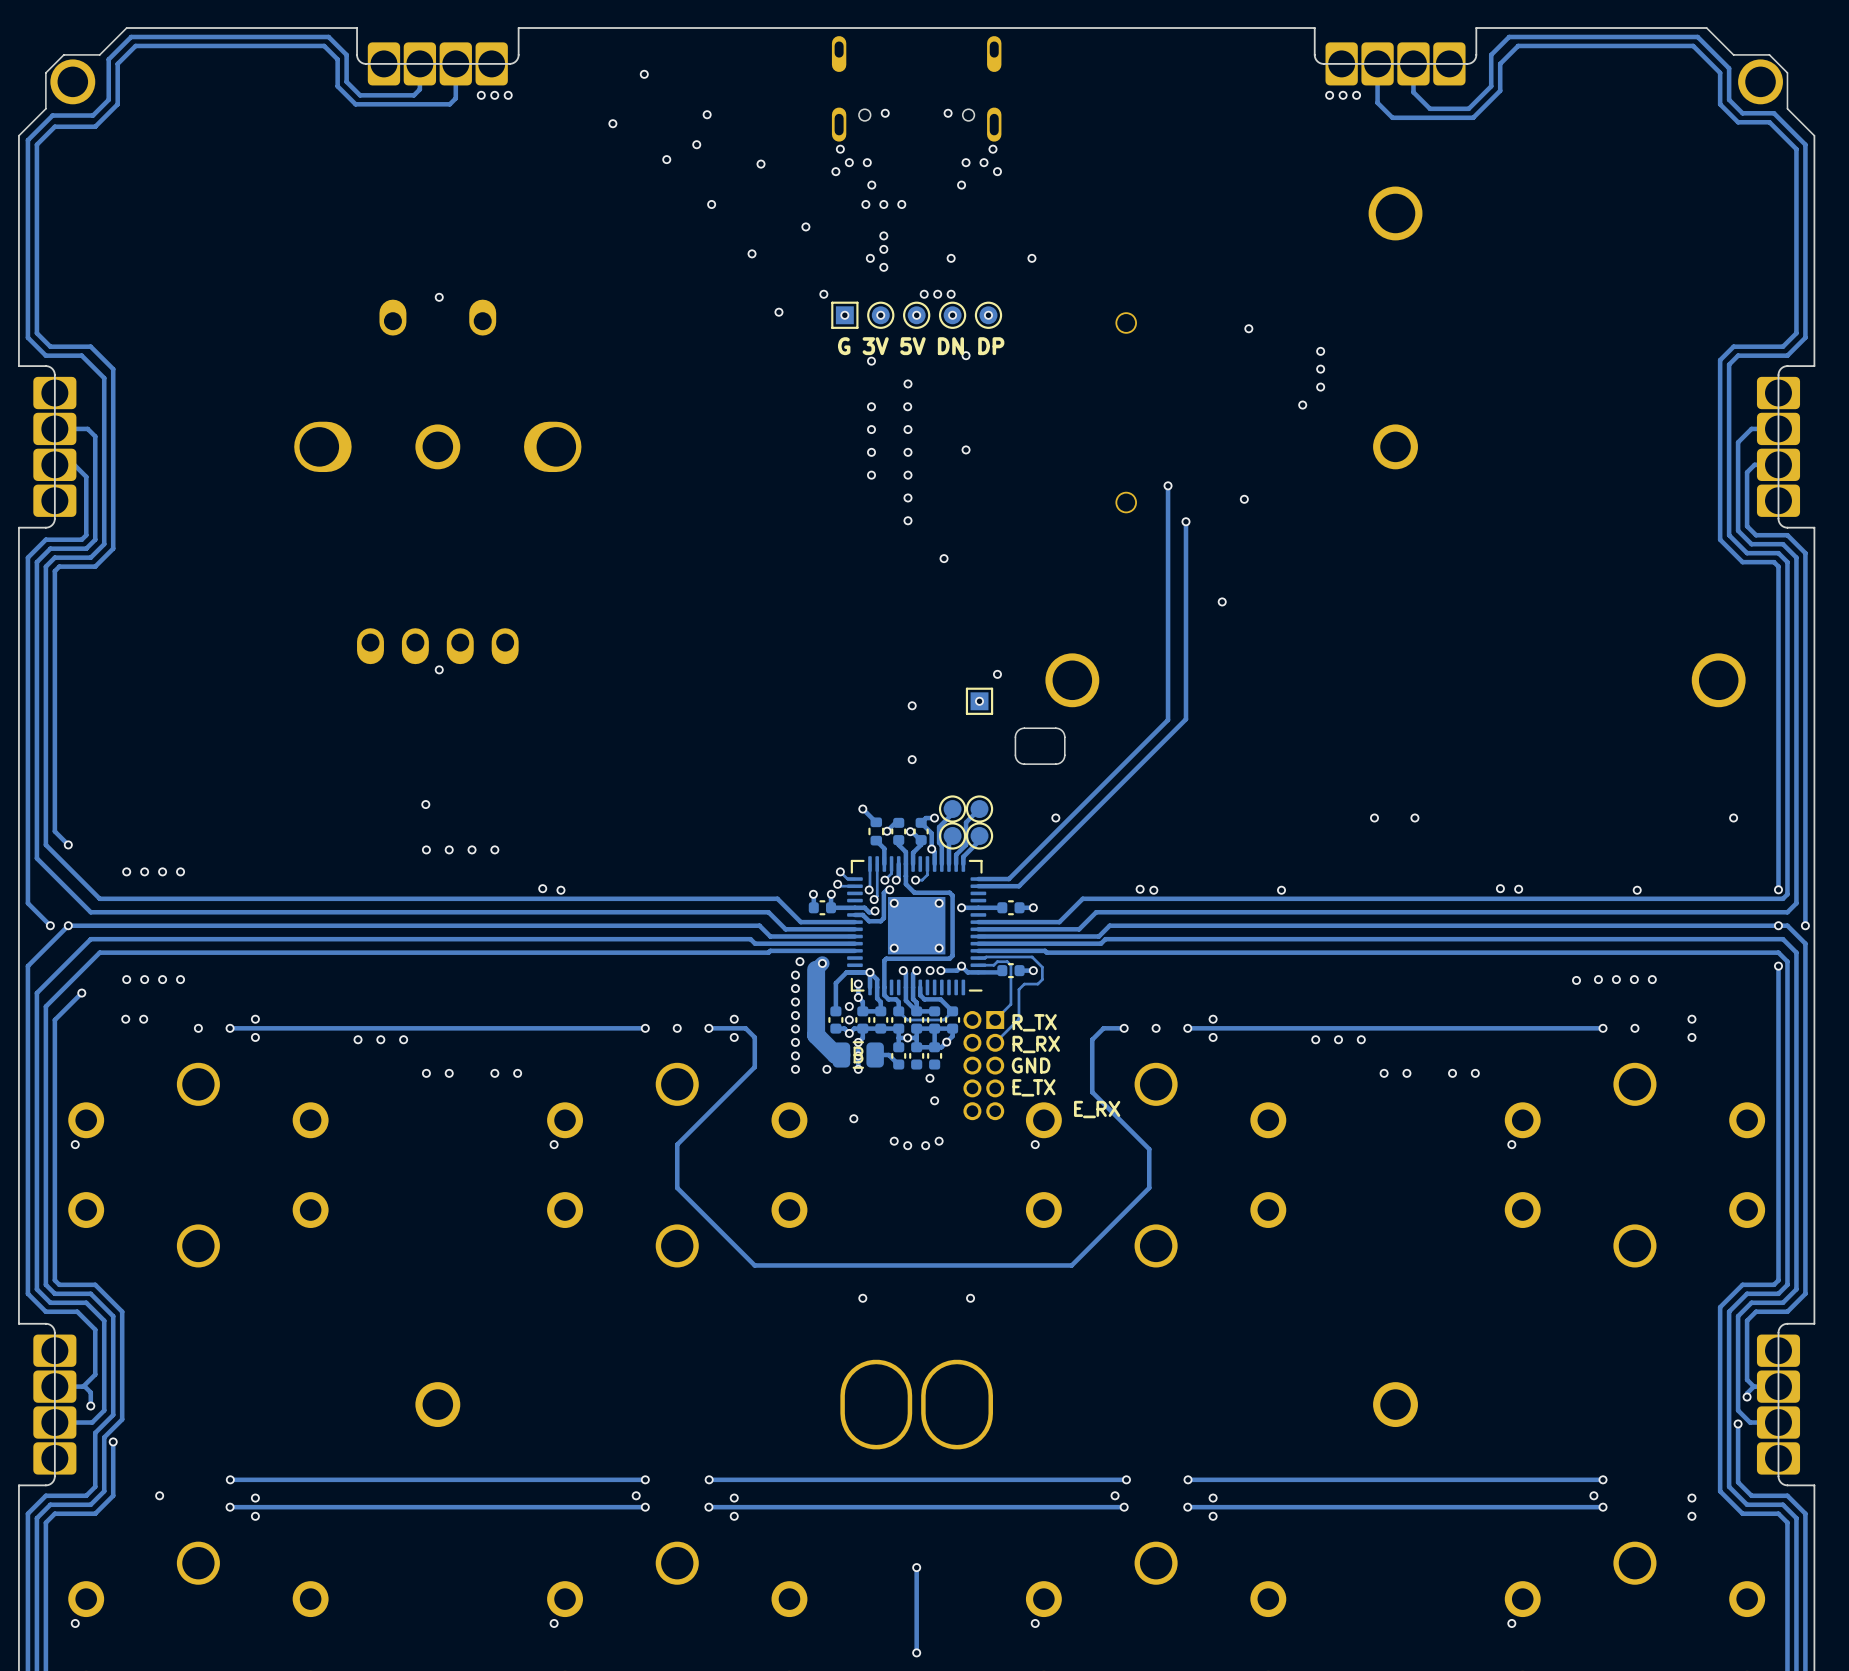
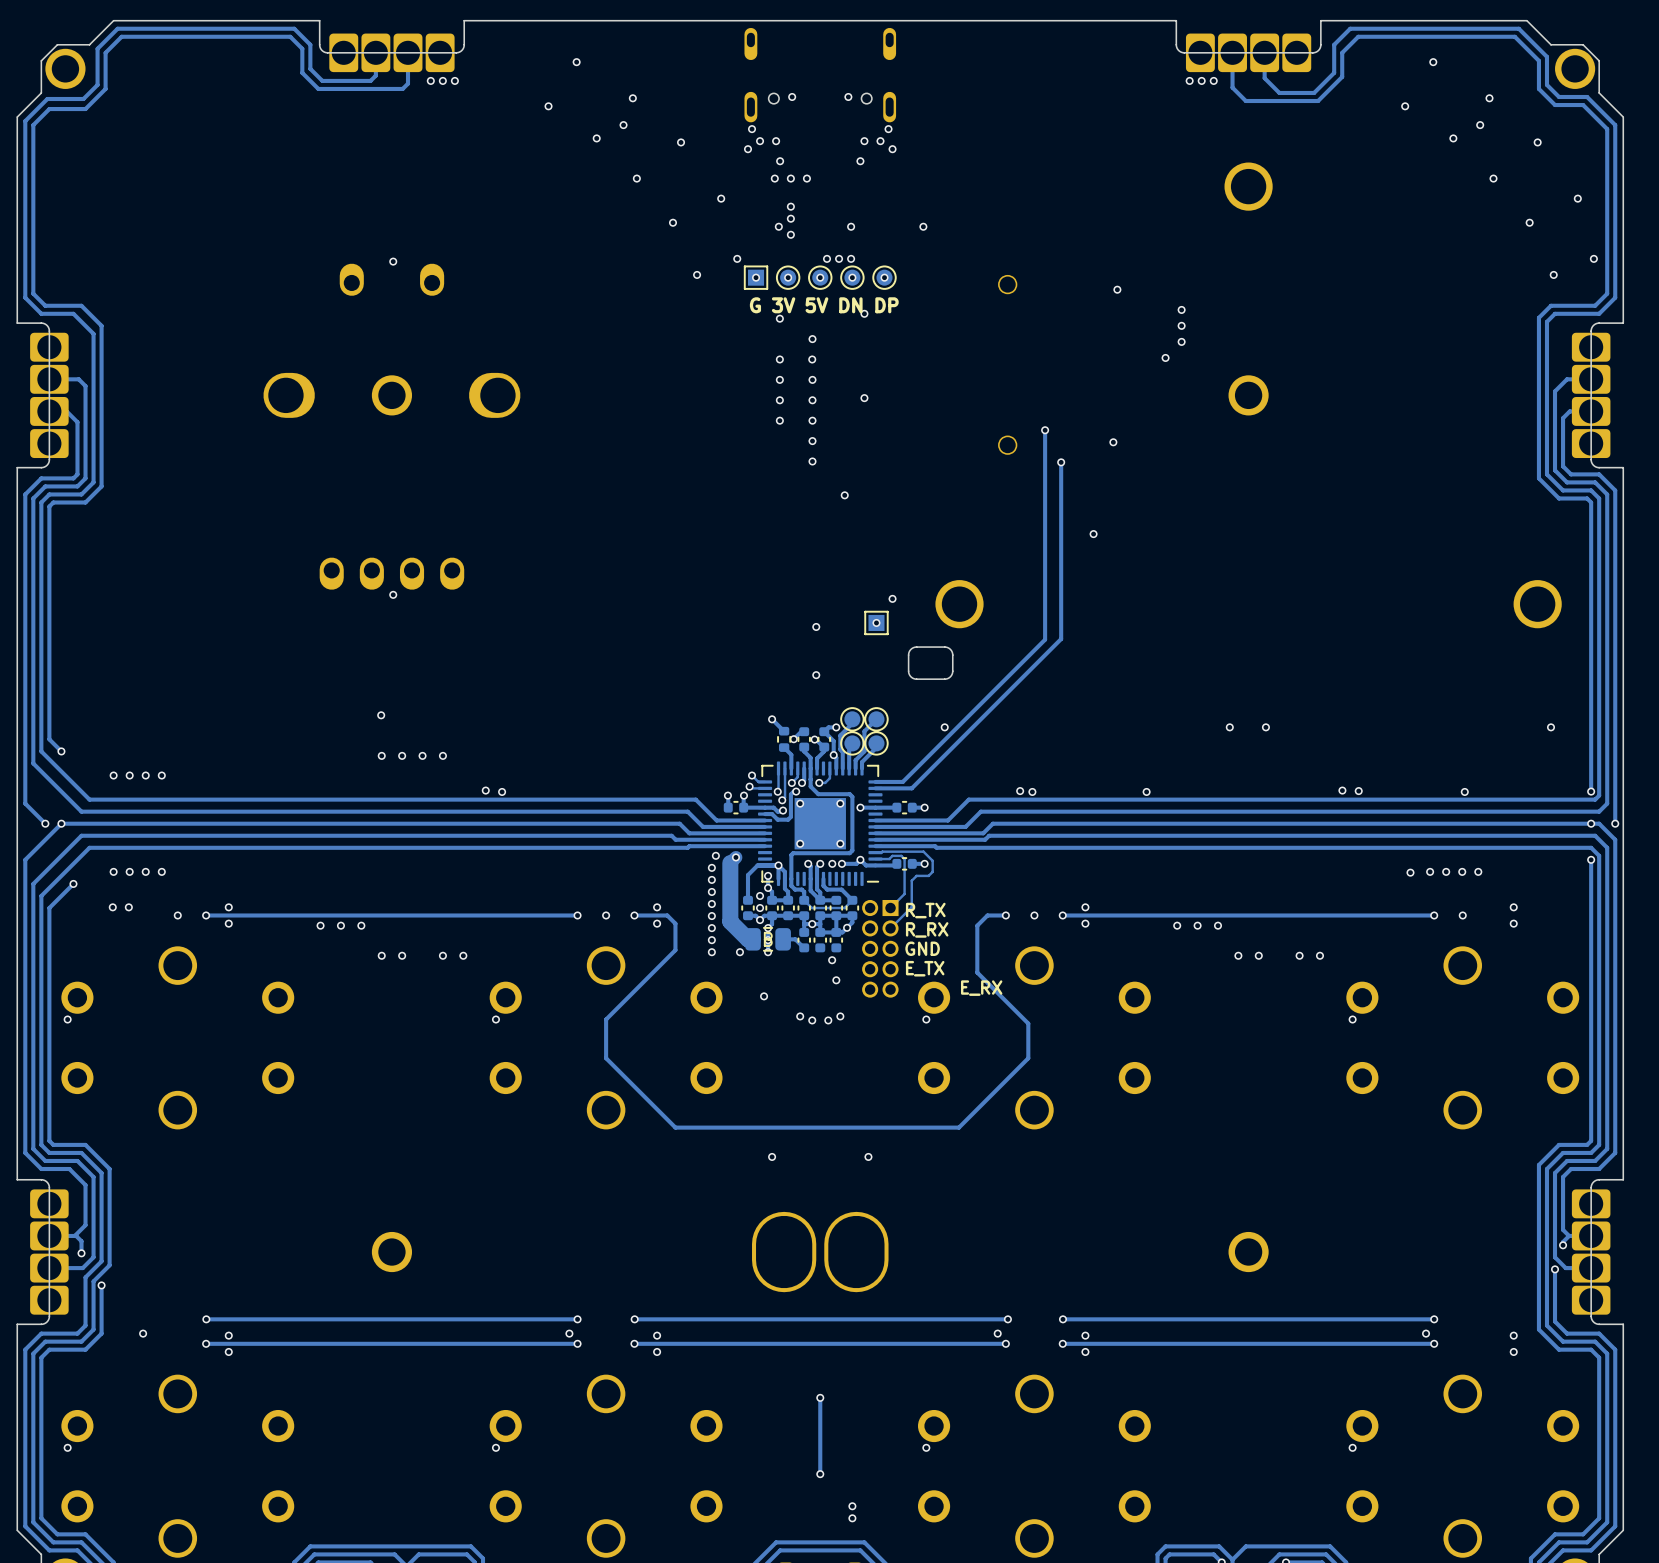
via: none -> (1433, 62)
via: none -> (1489, 98)
via: none -> (1405, 106)
via: none -> (1480, 125)
via: none -> (1453, 138)
via: none -> (1537, 142)
via: none -> (1493, 178)
via: none -> (1577, 198)
via: none -> (1529, 222)
via: none -> (1593, 258)
via: none -> (1553, 274)

